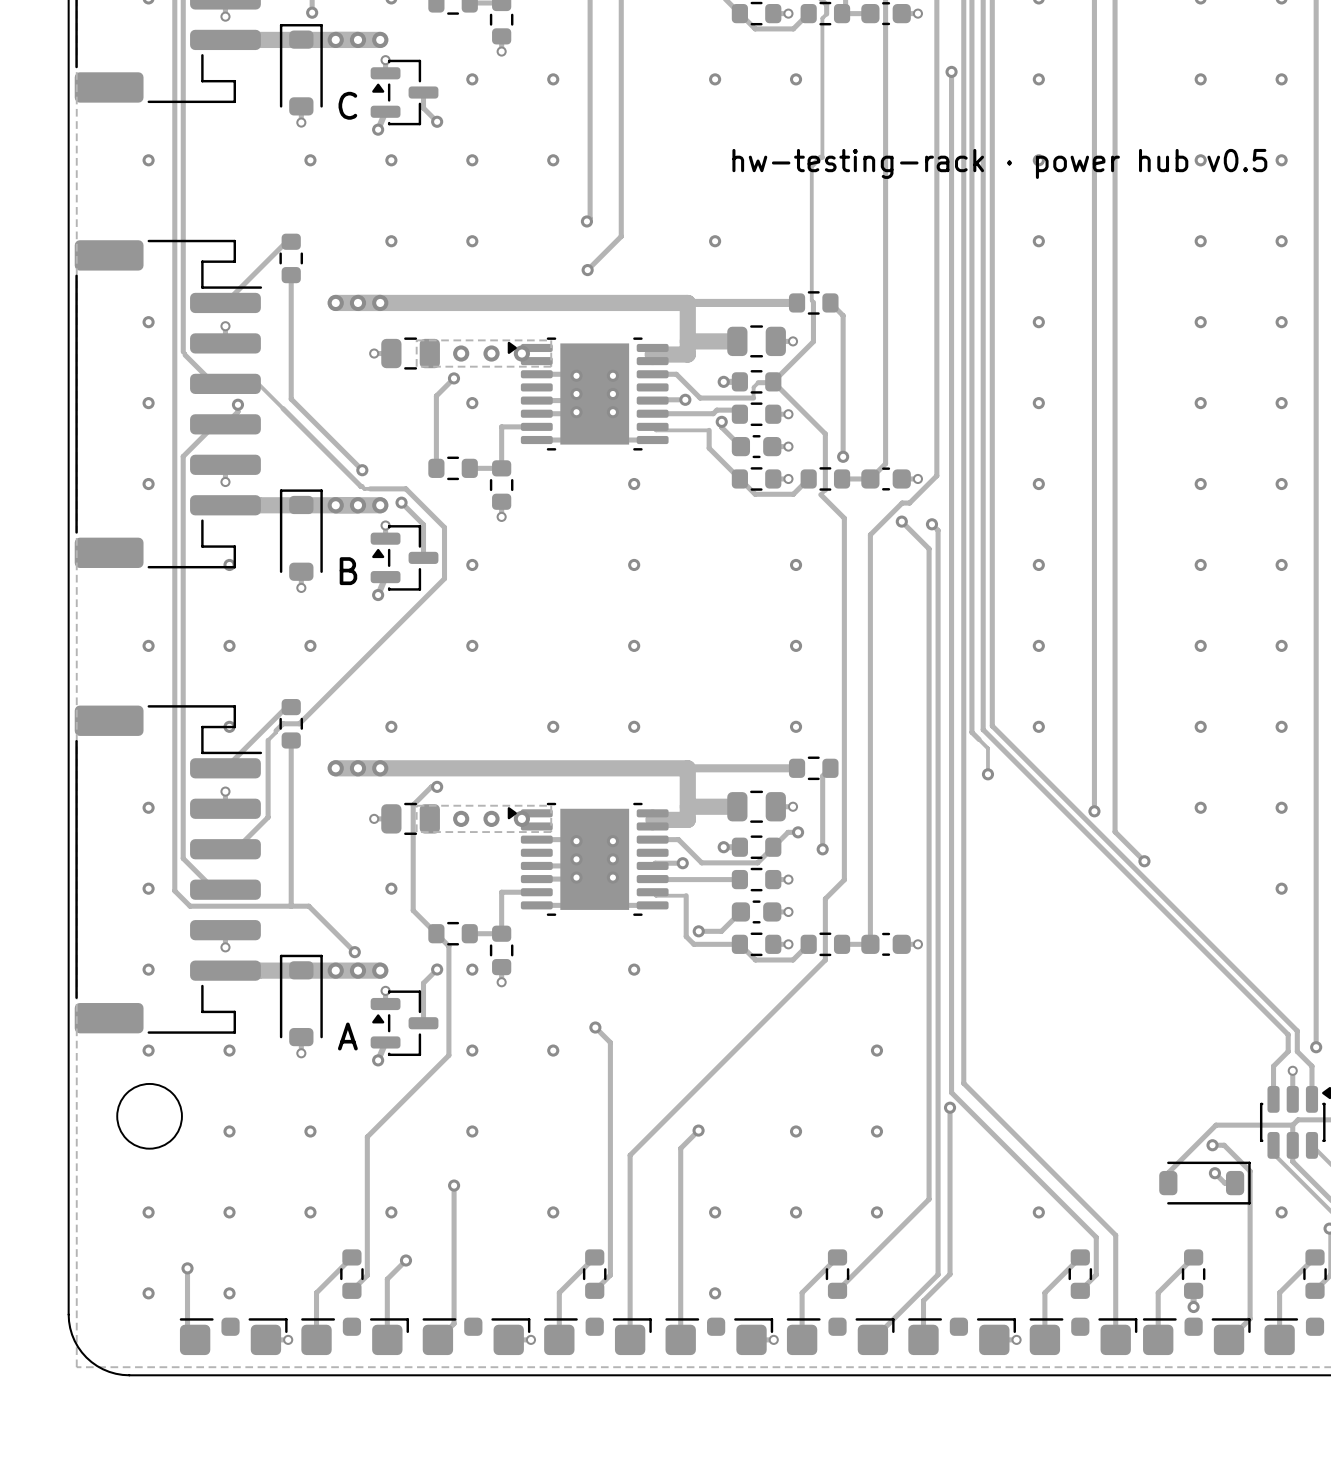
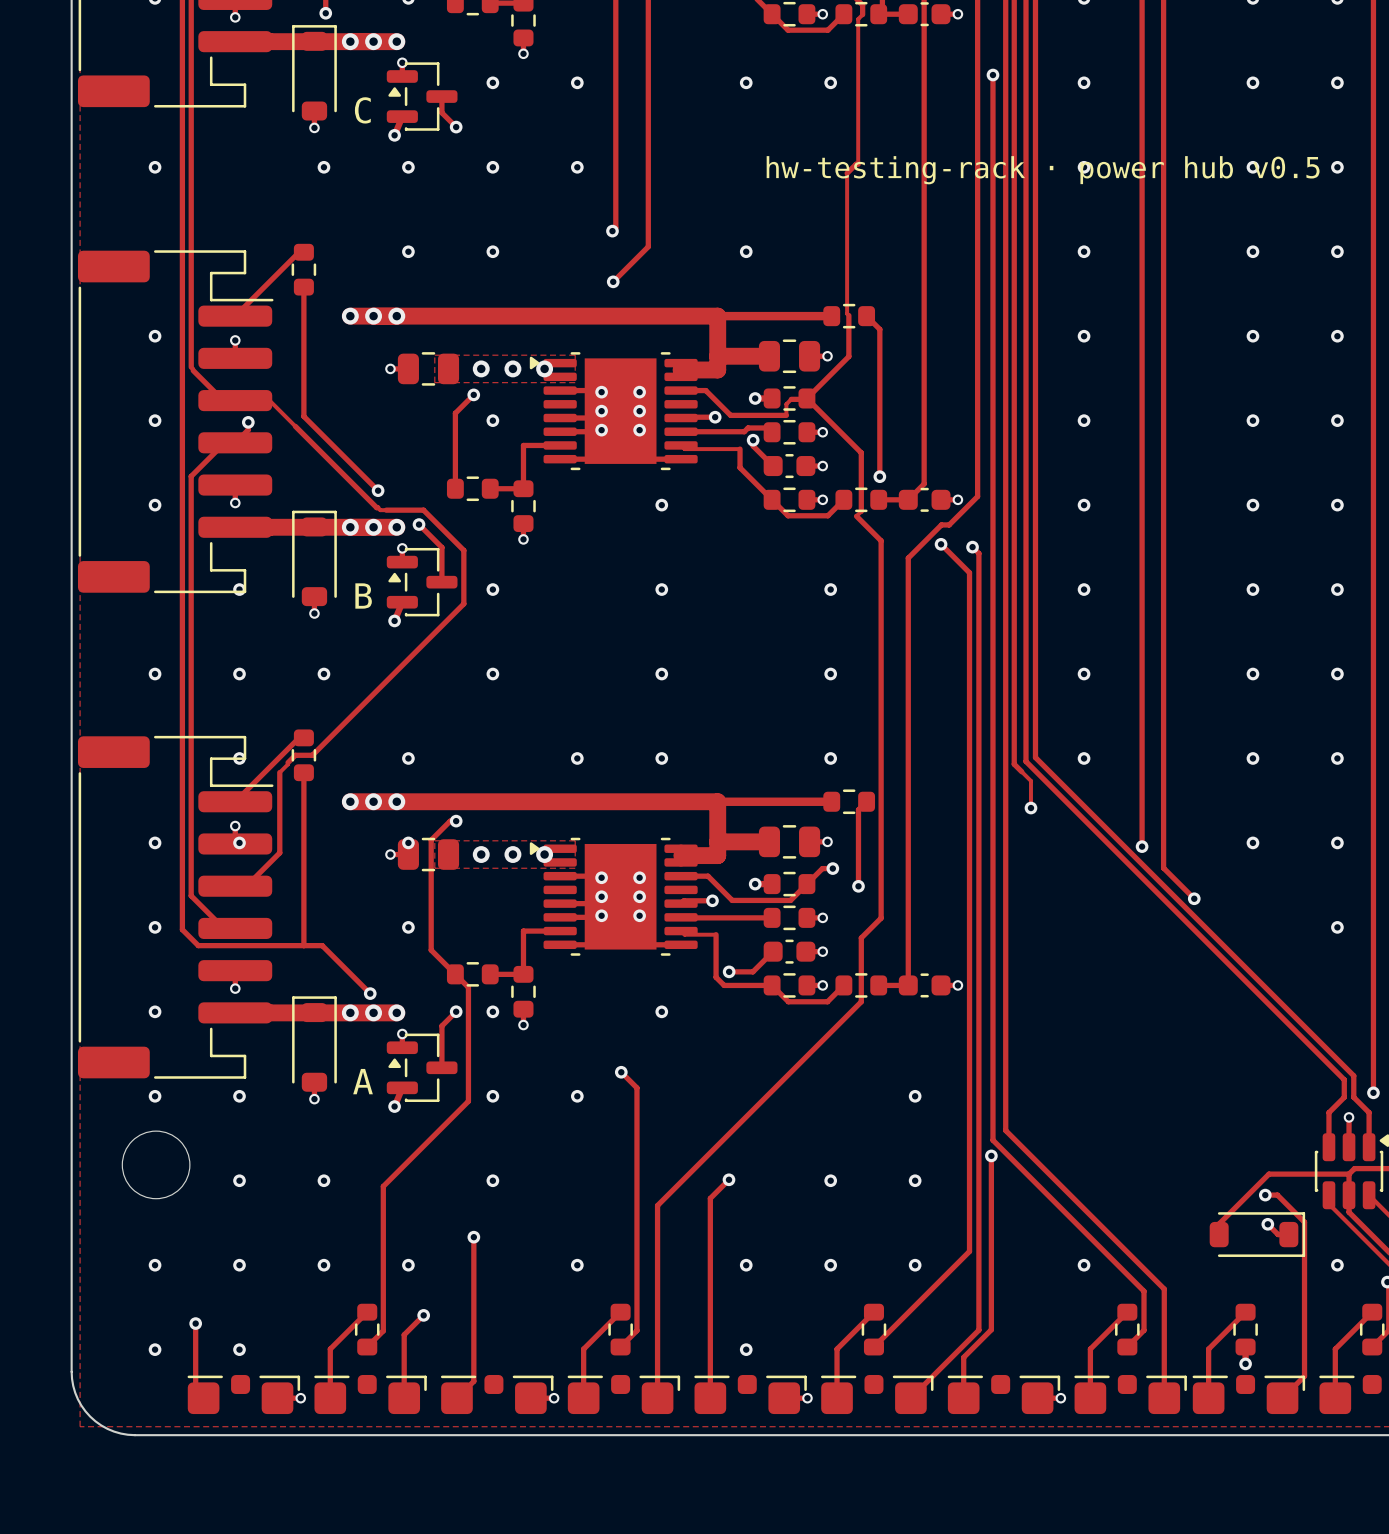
via: none -> (239, 842)
via: none -> (408, 842)

